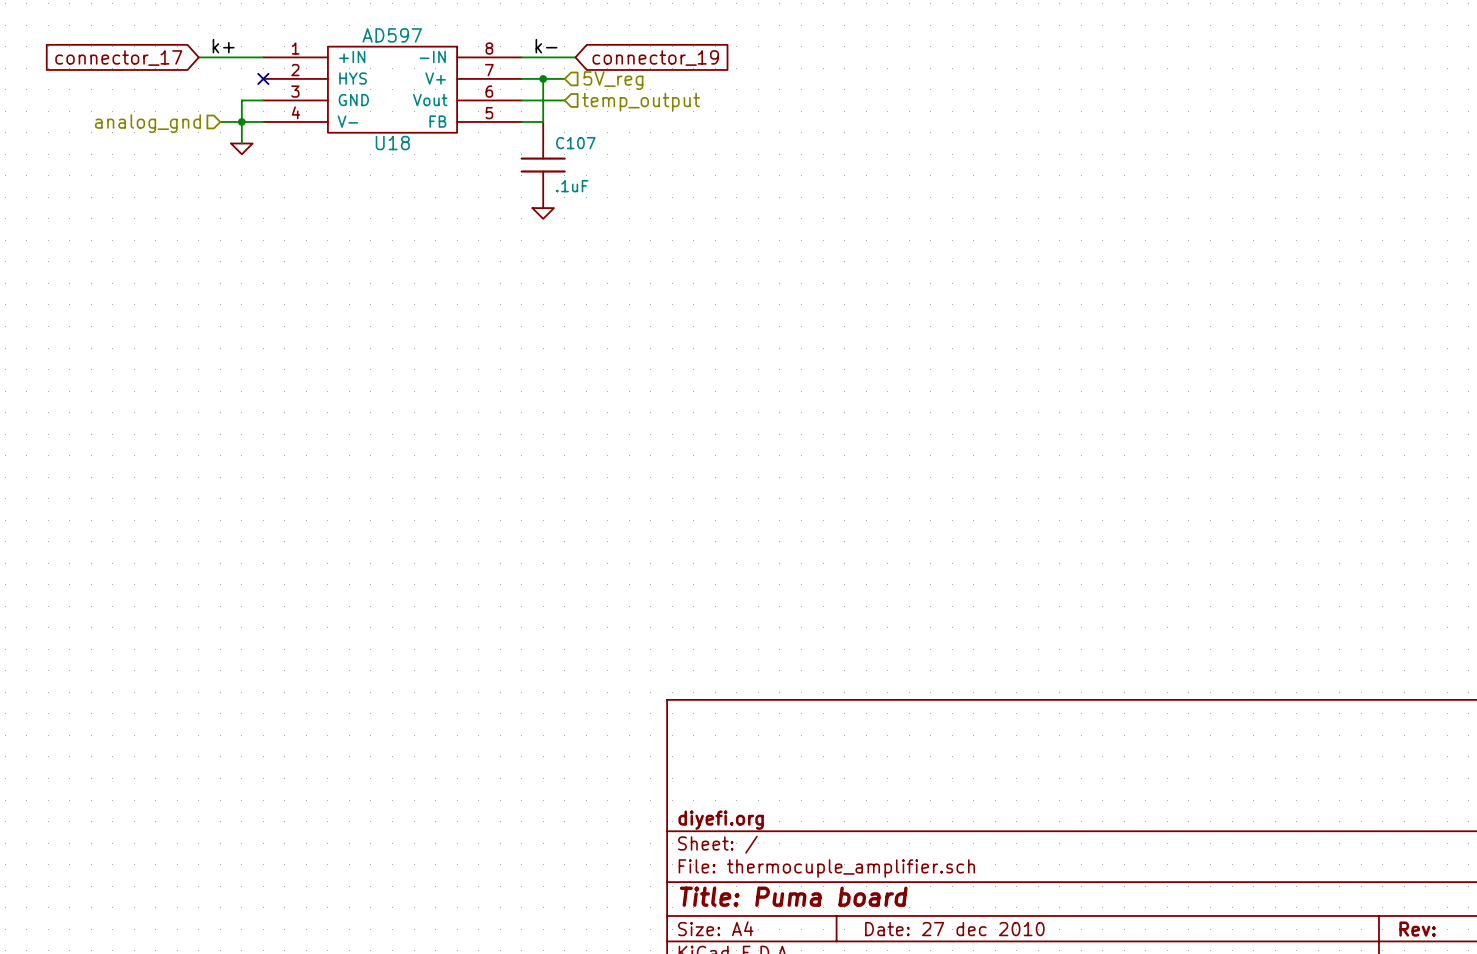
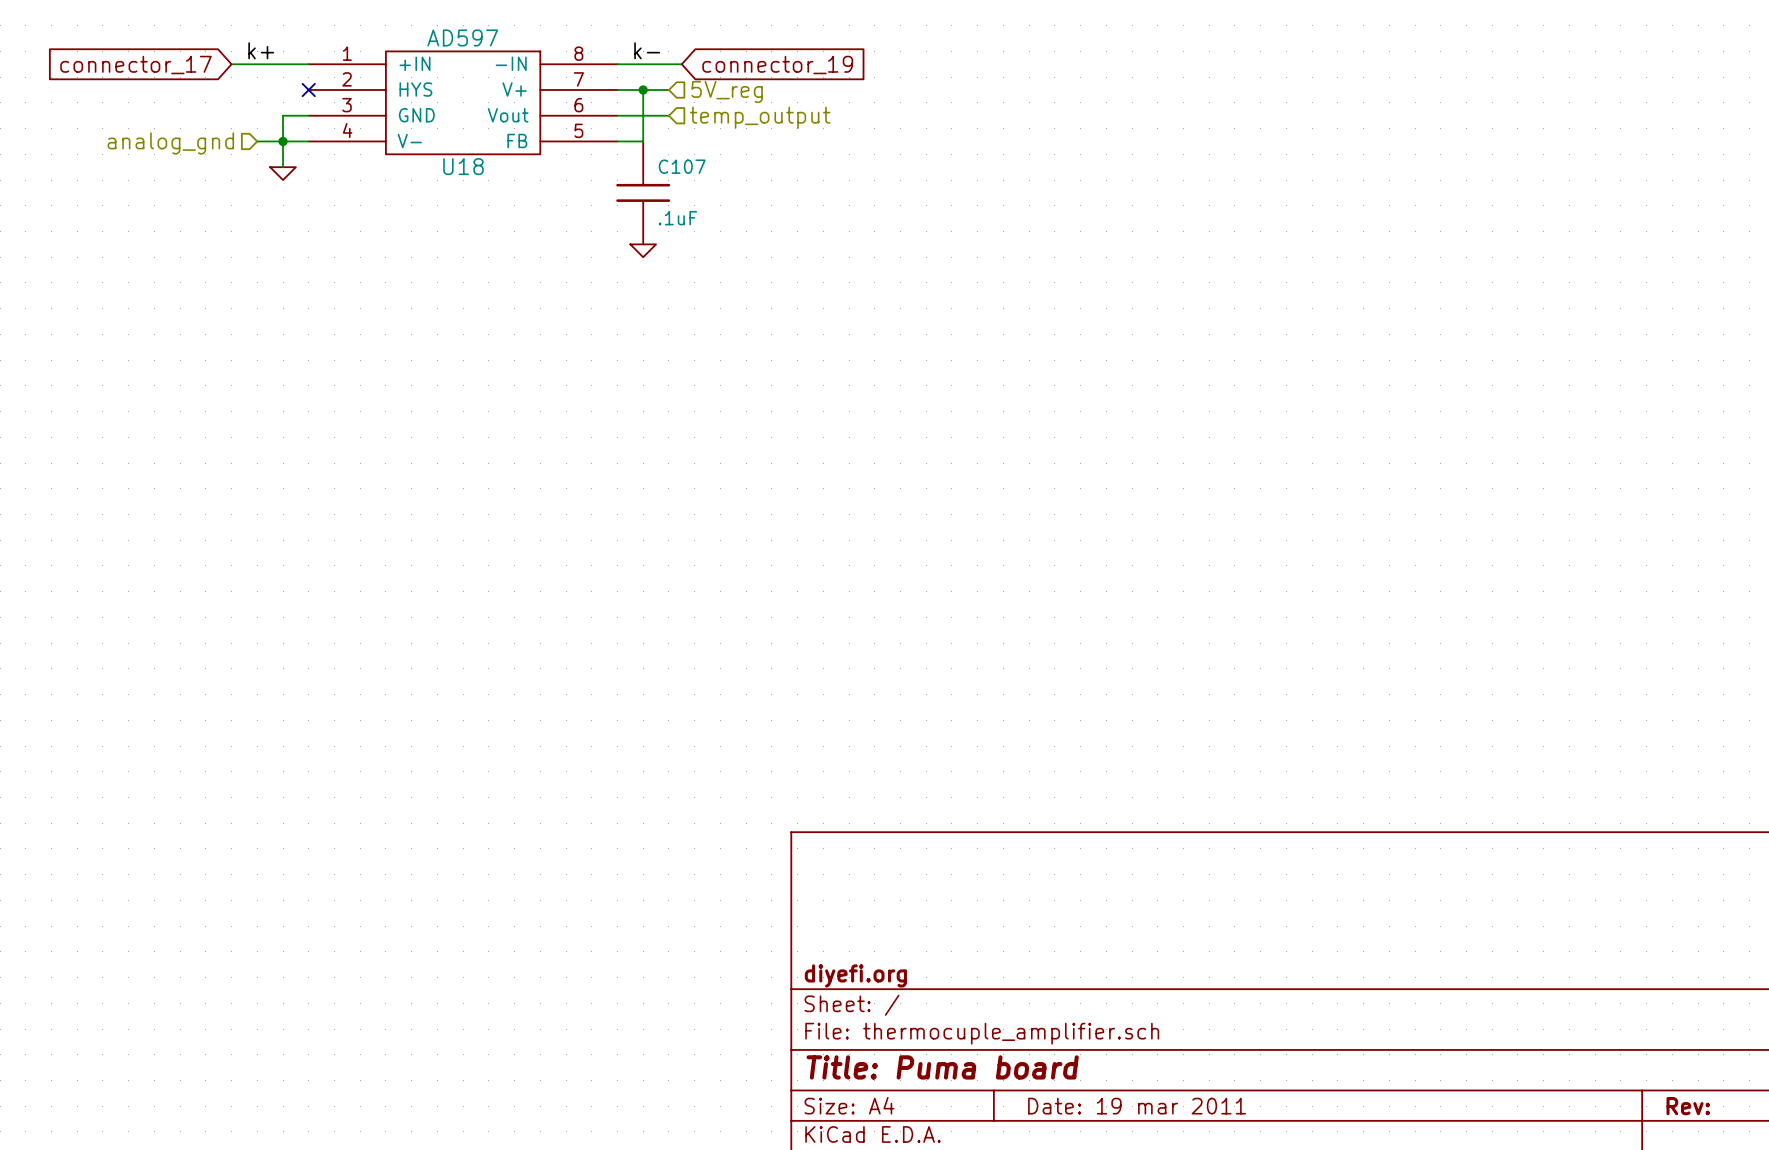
title block: Date: 27 dec 2010 (954, 929) -> Date: 19 mar 2011 (1137, 1106)

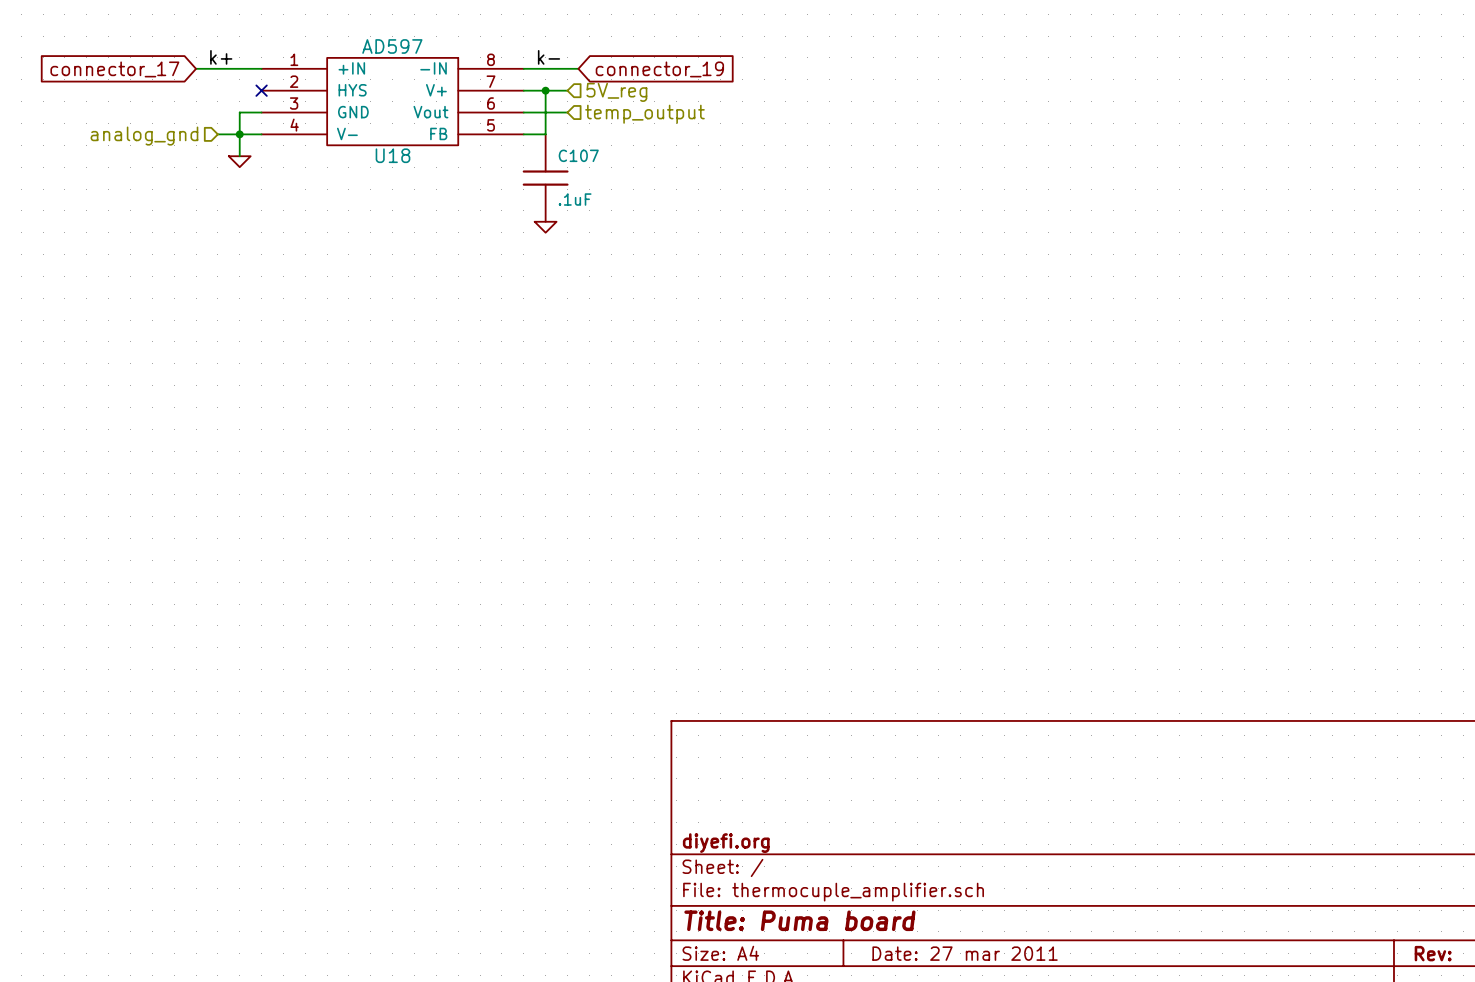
title block: Date: 19 mar 2011 (1137, 1106) -> Date: 27 mar 2011 (965, 953)

